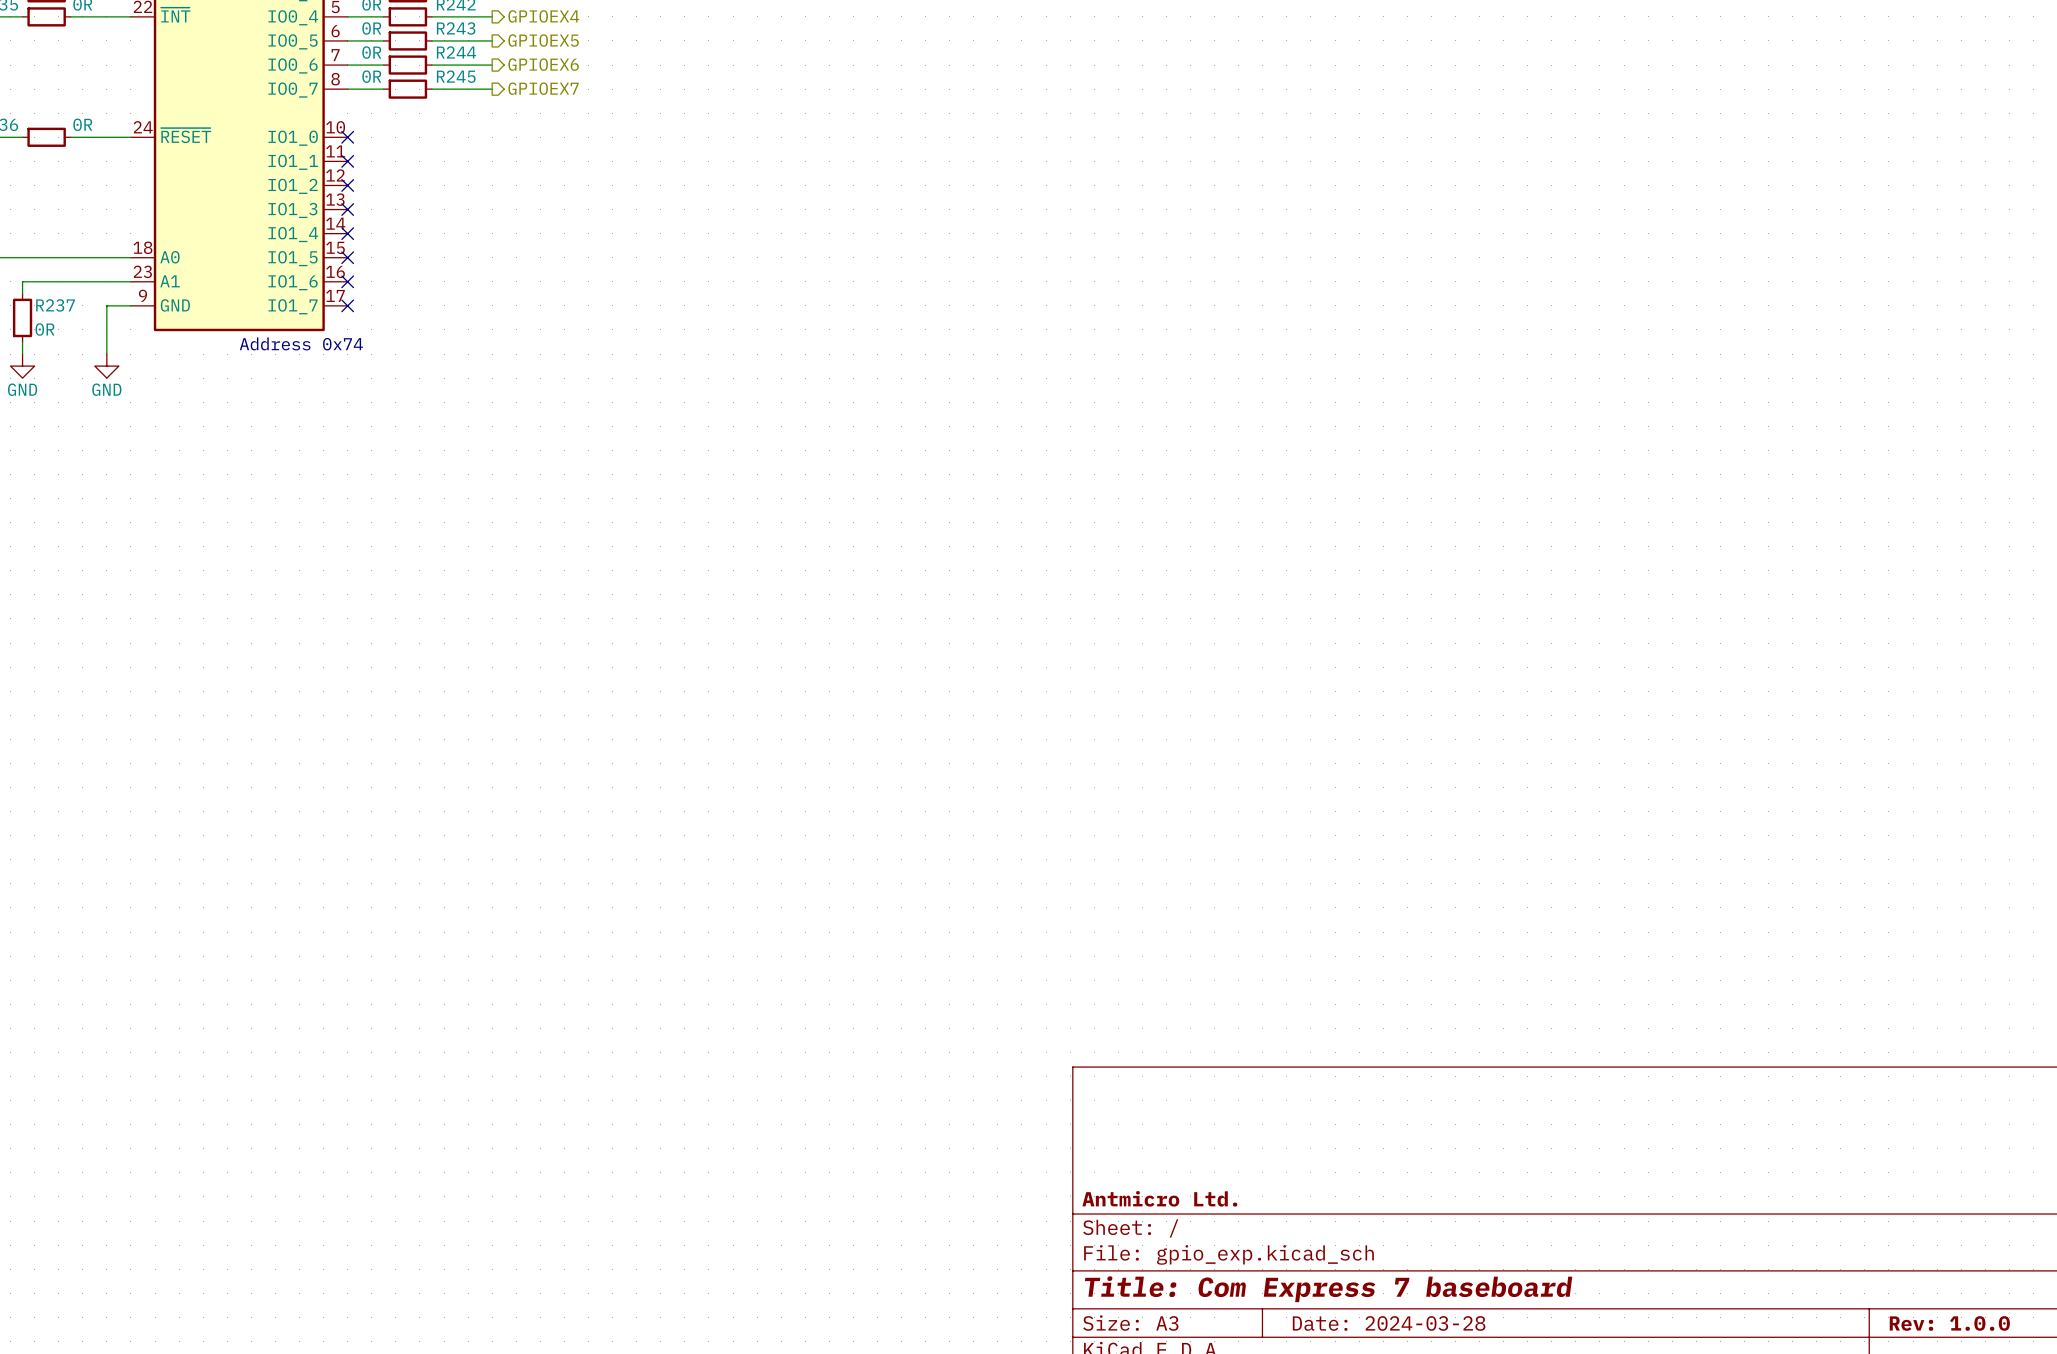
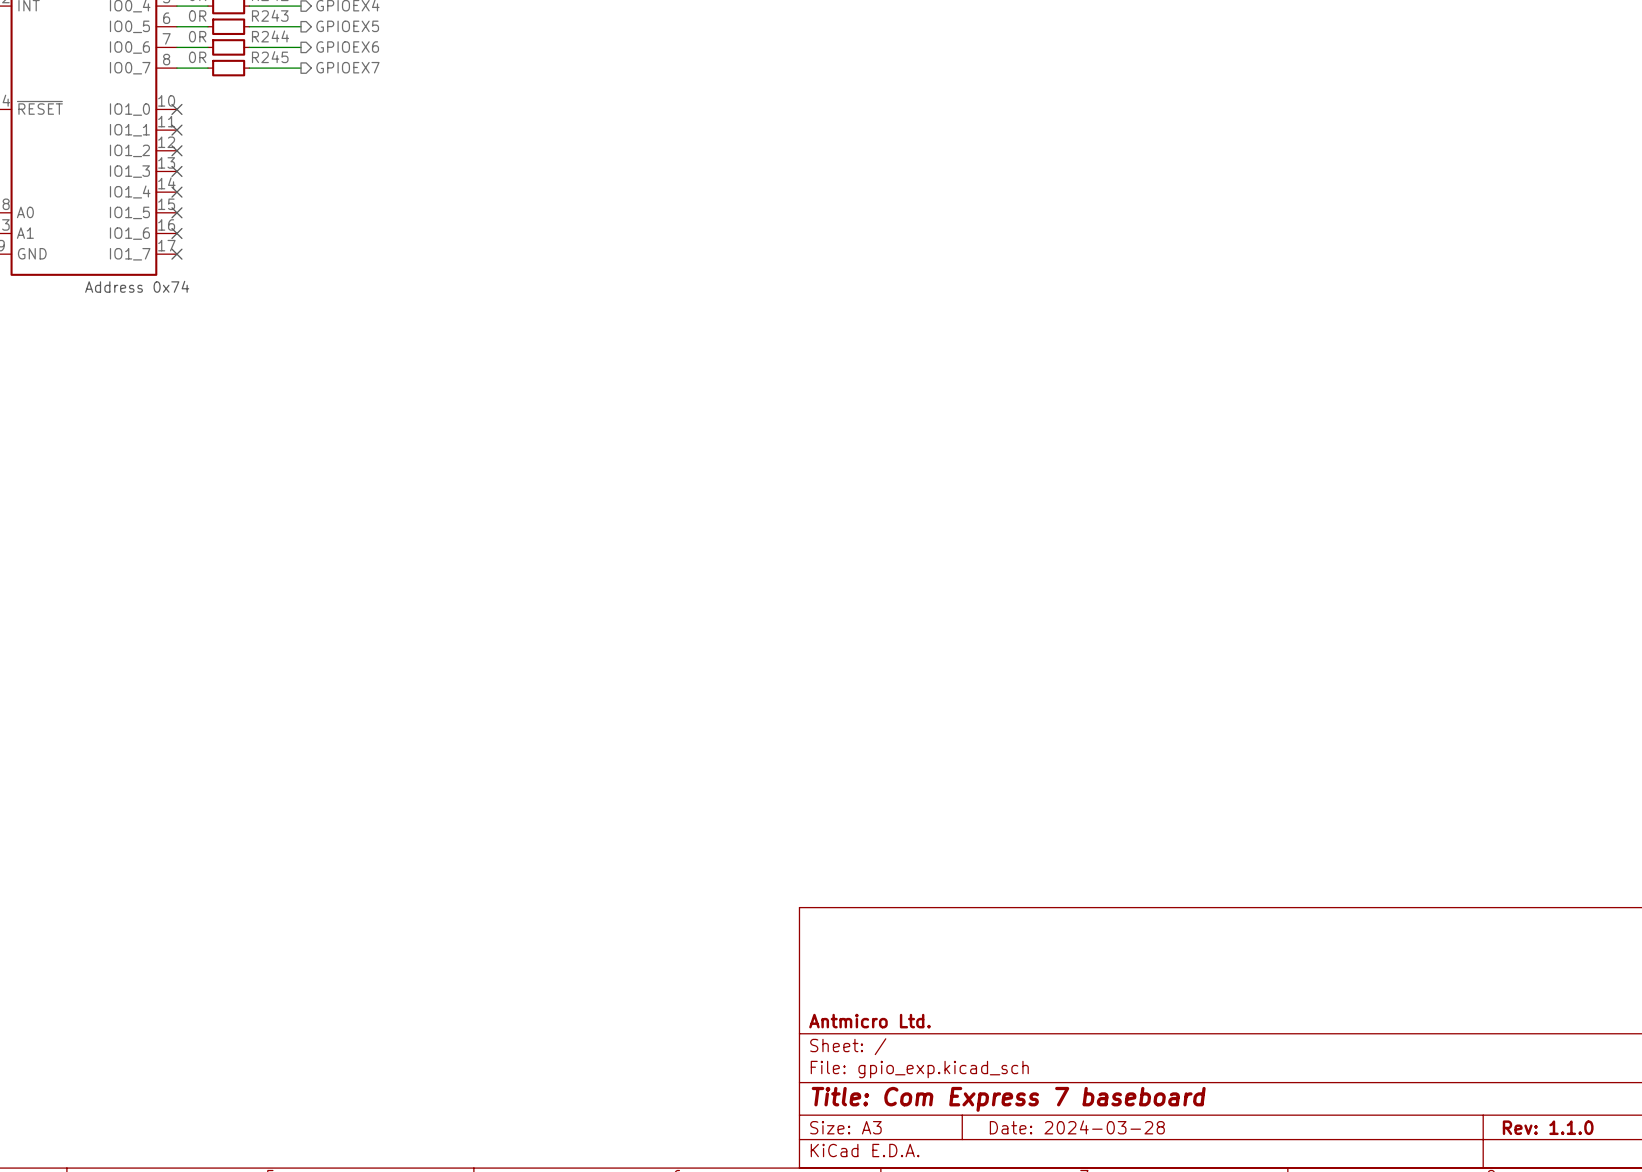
title block: Rev: 1.0.0 (1949, 1323) -> Rev: 1.1.0 (1548, 1127)

